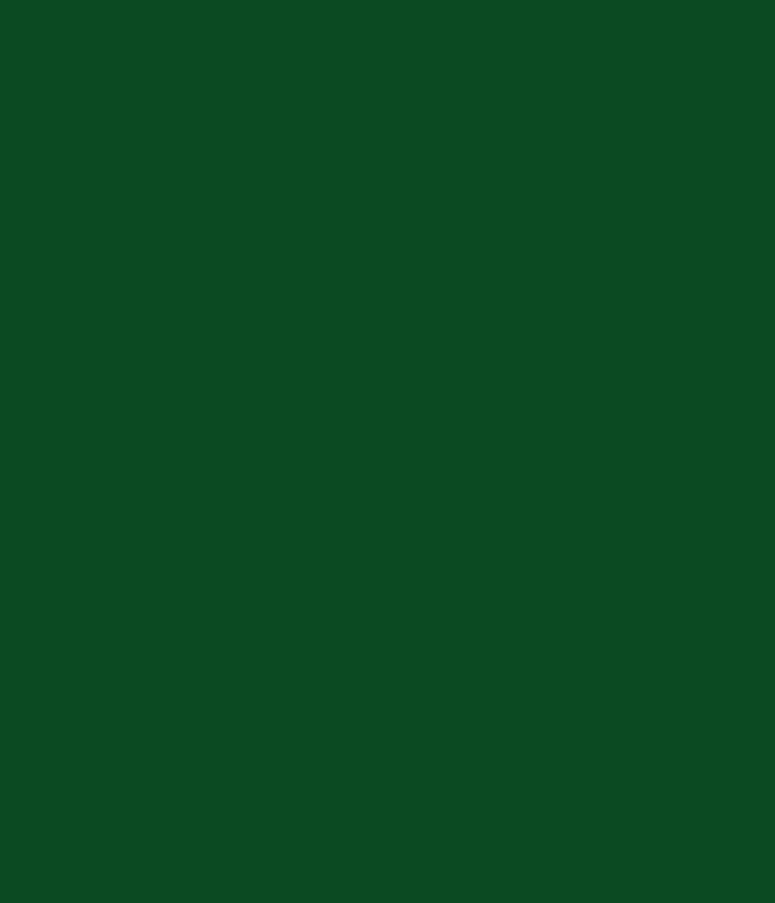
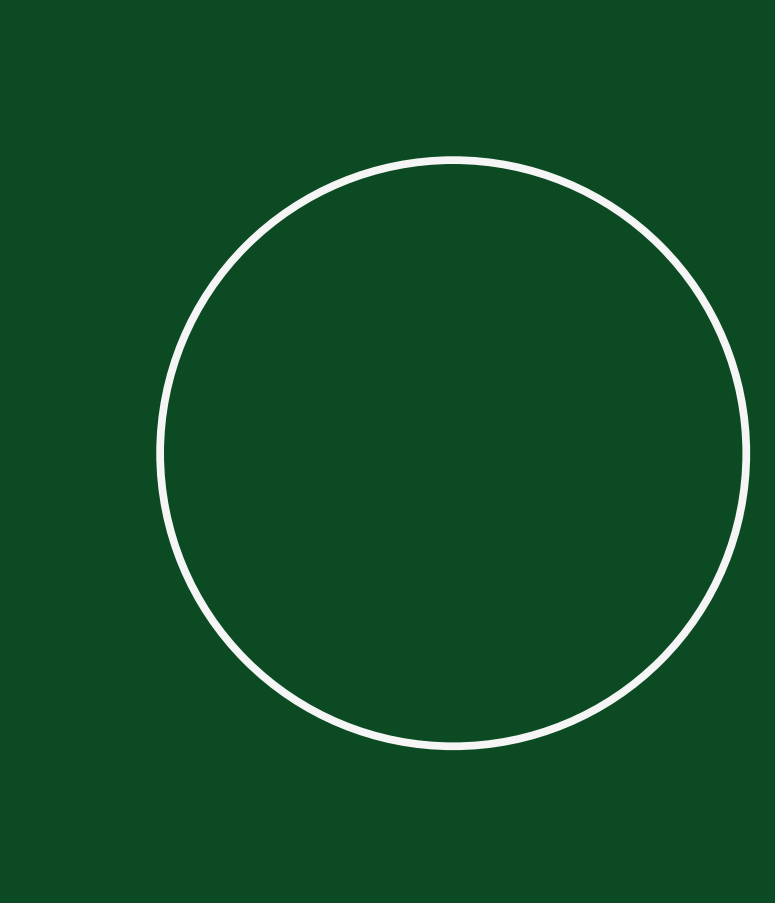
drawing: none -> [156, 156, 751, 751]

